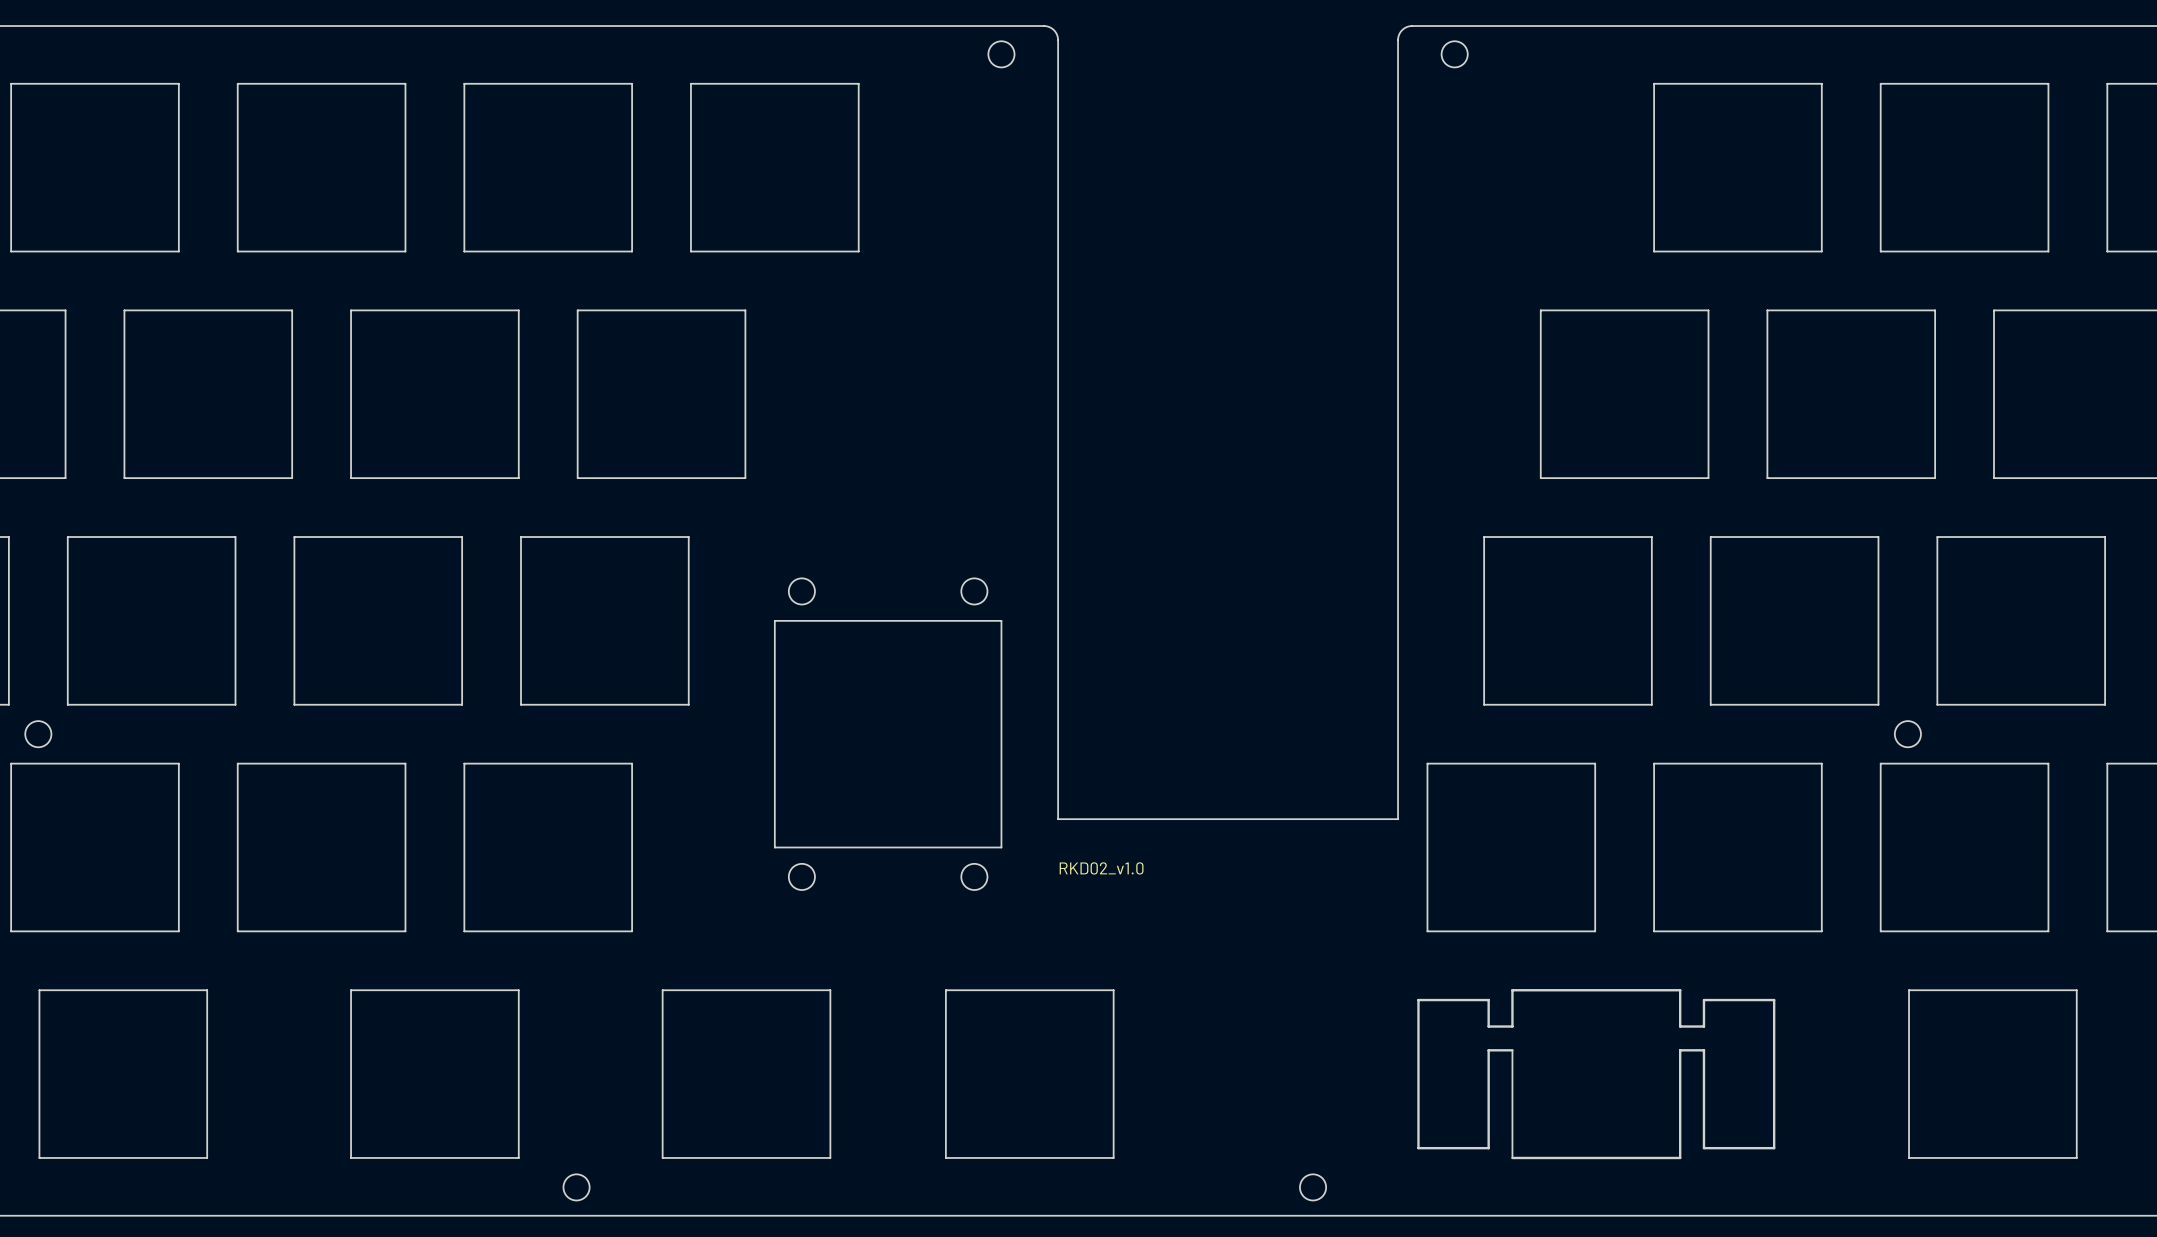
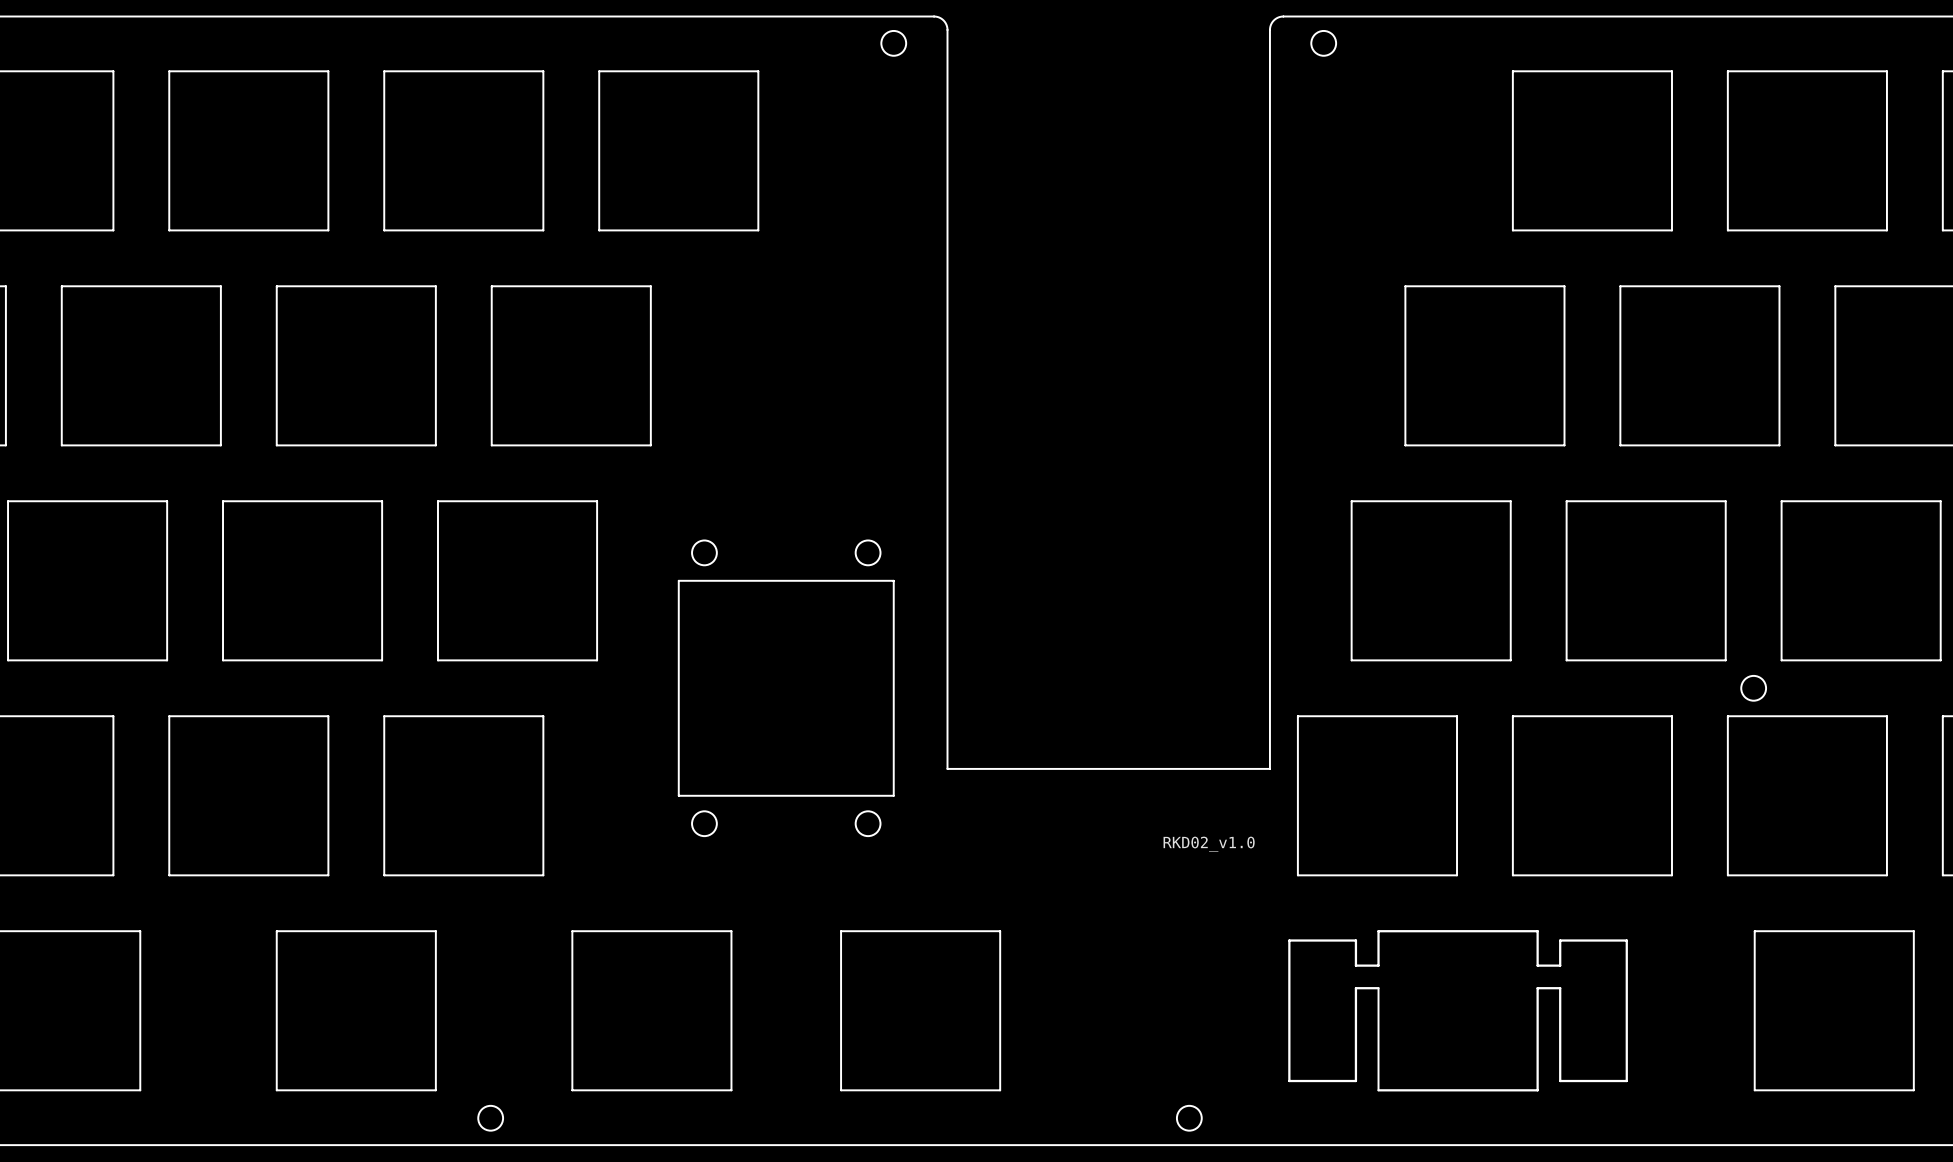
text position: RKD02_v1.0 (1101, 868) -> RKD02_v1.0 (1209, 844)

